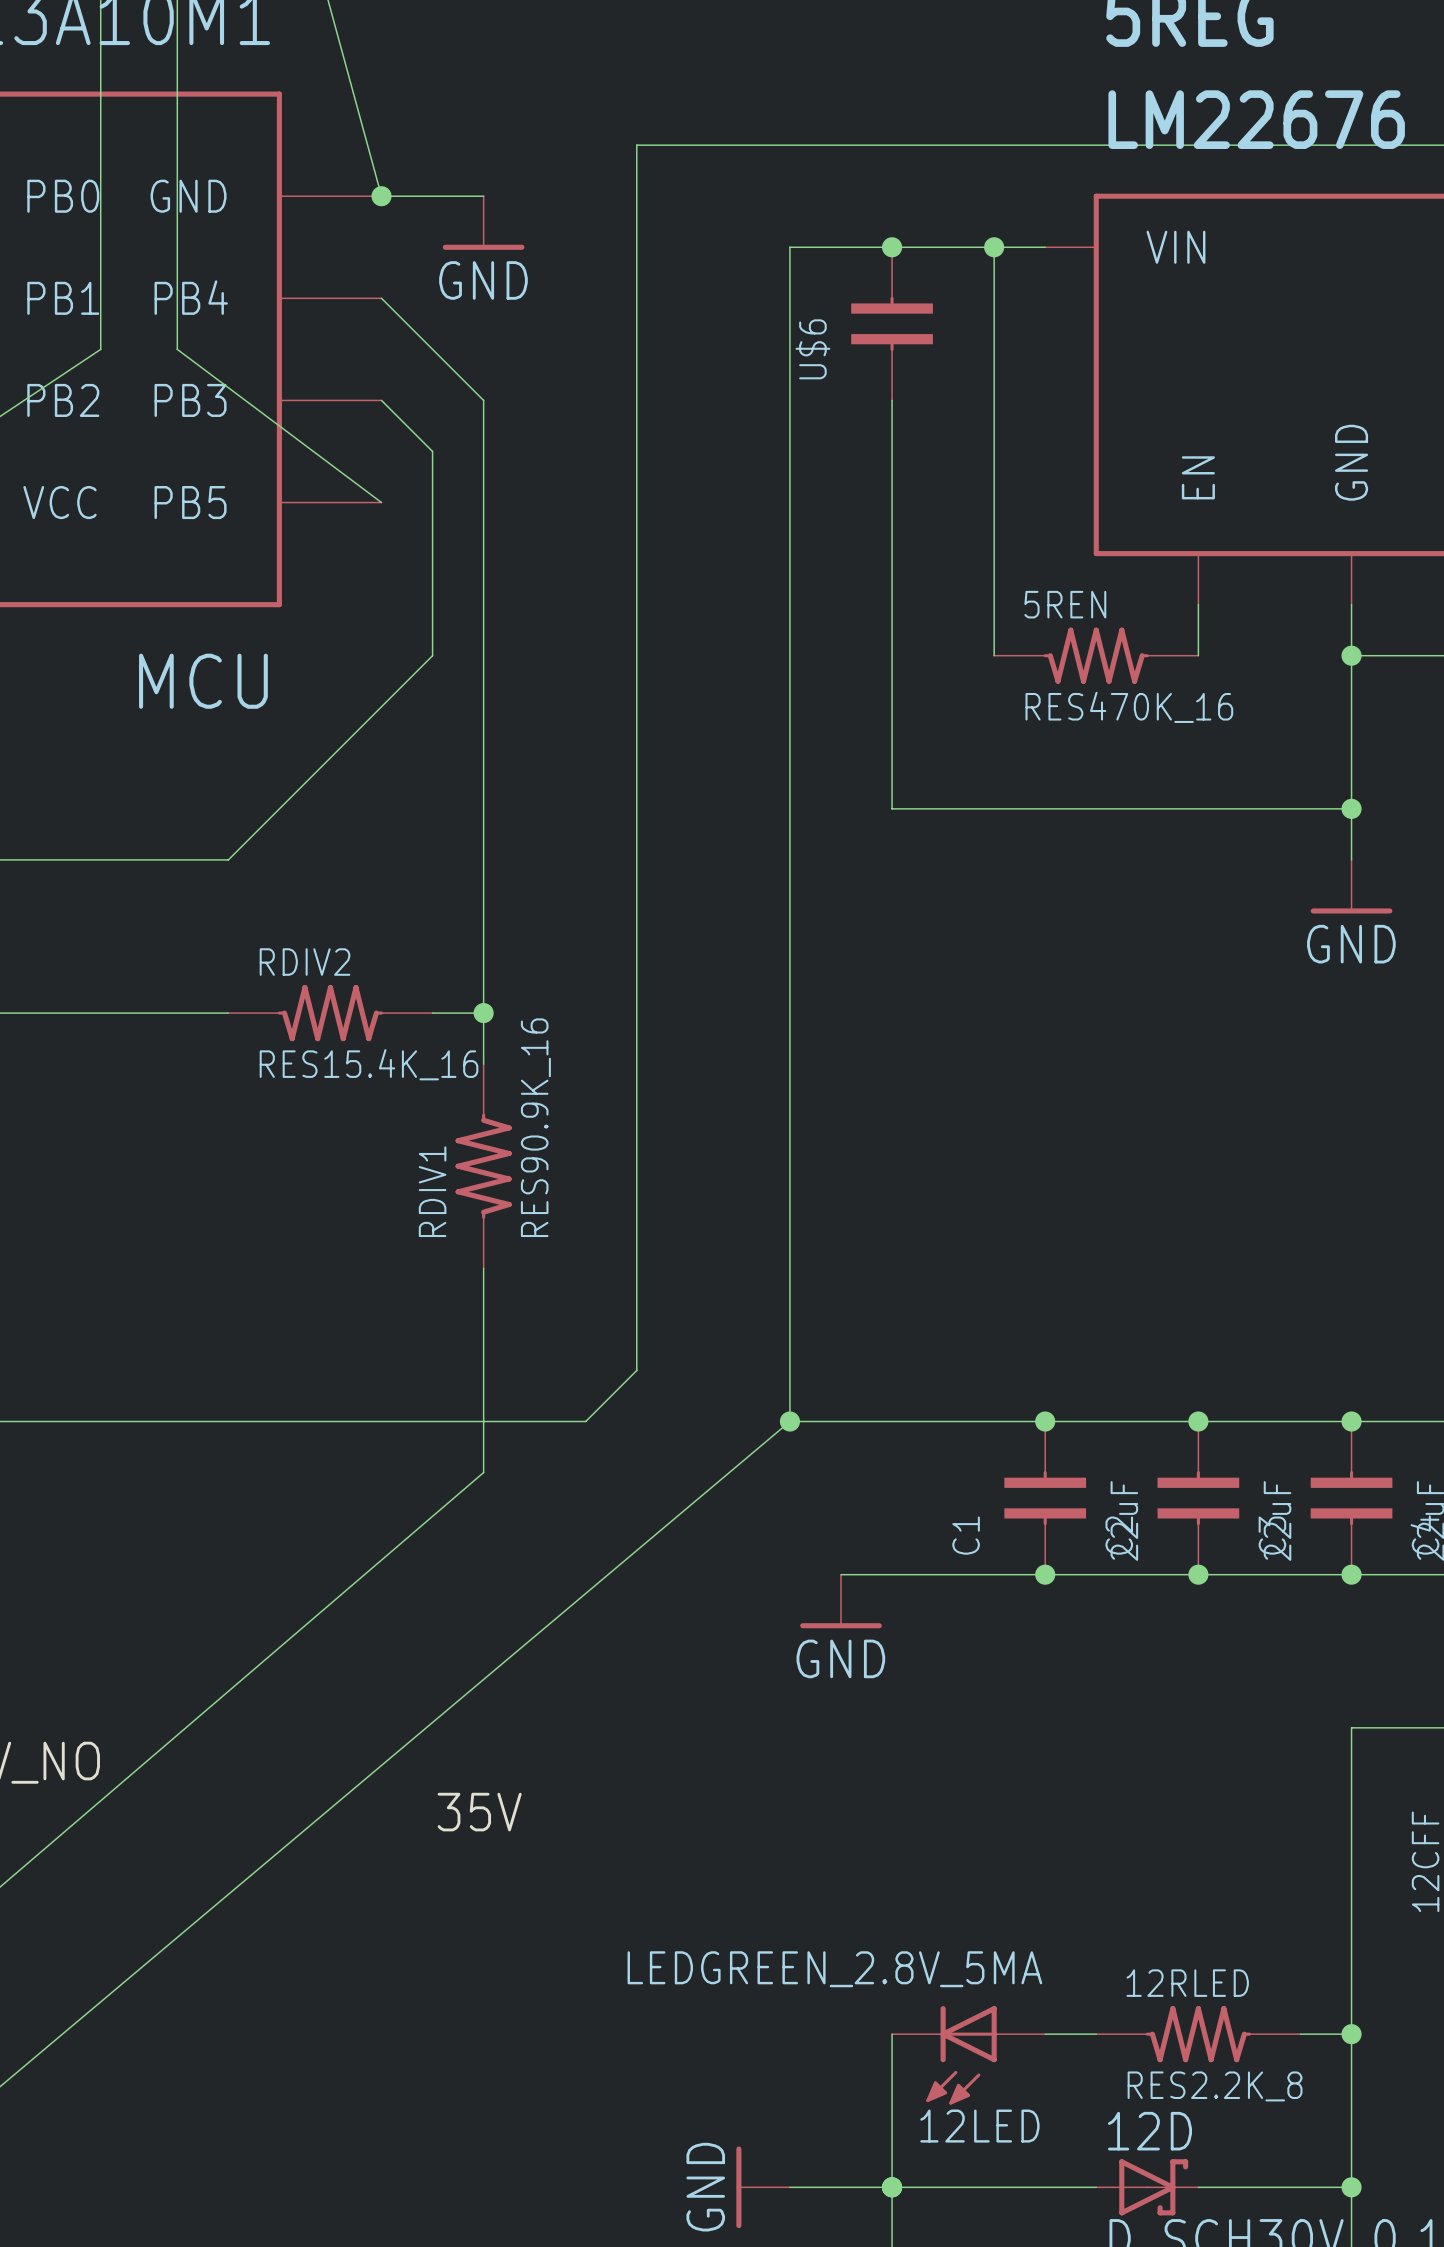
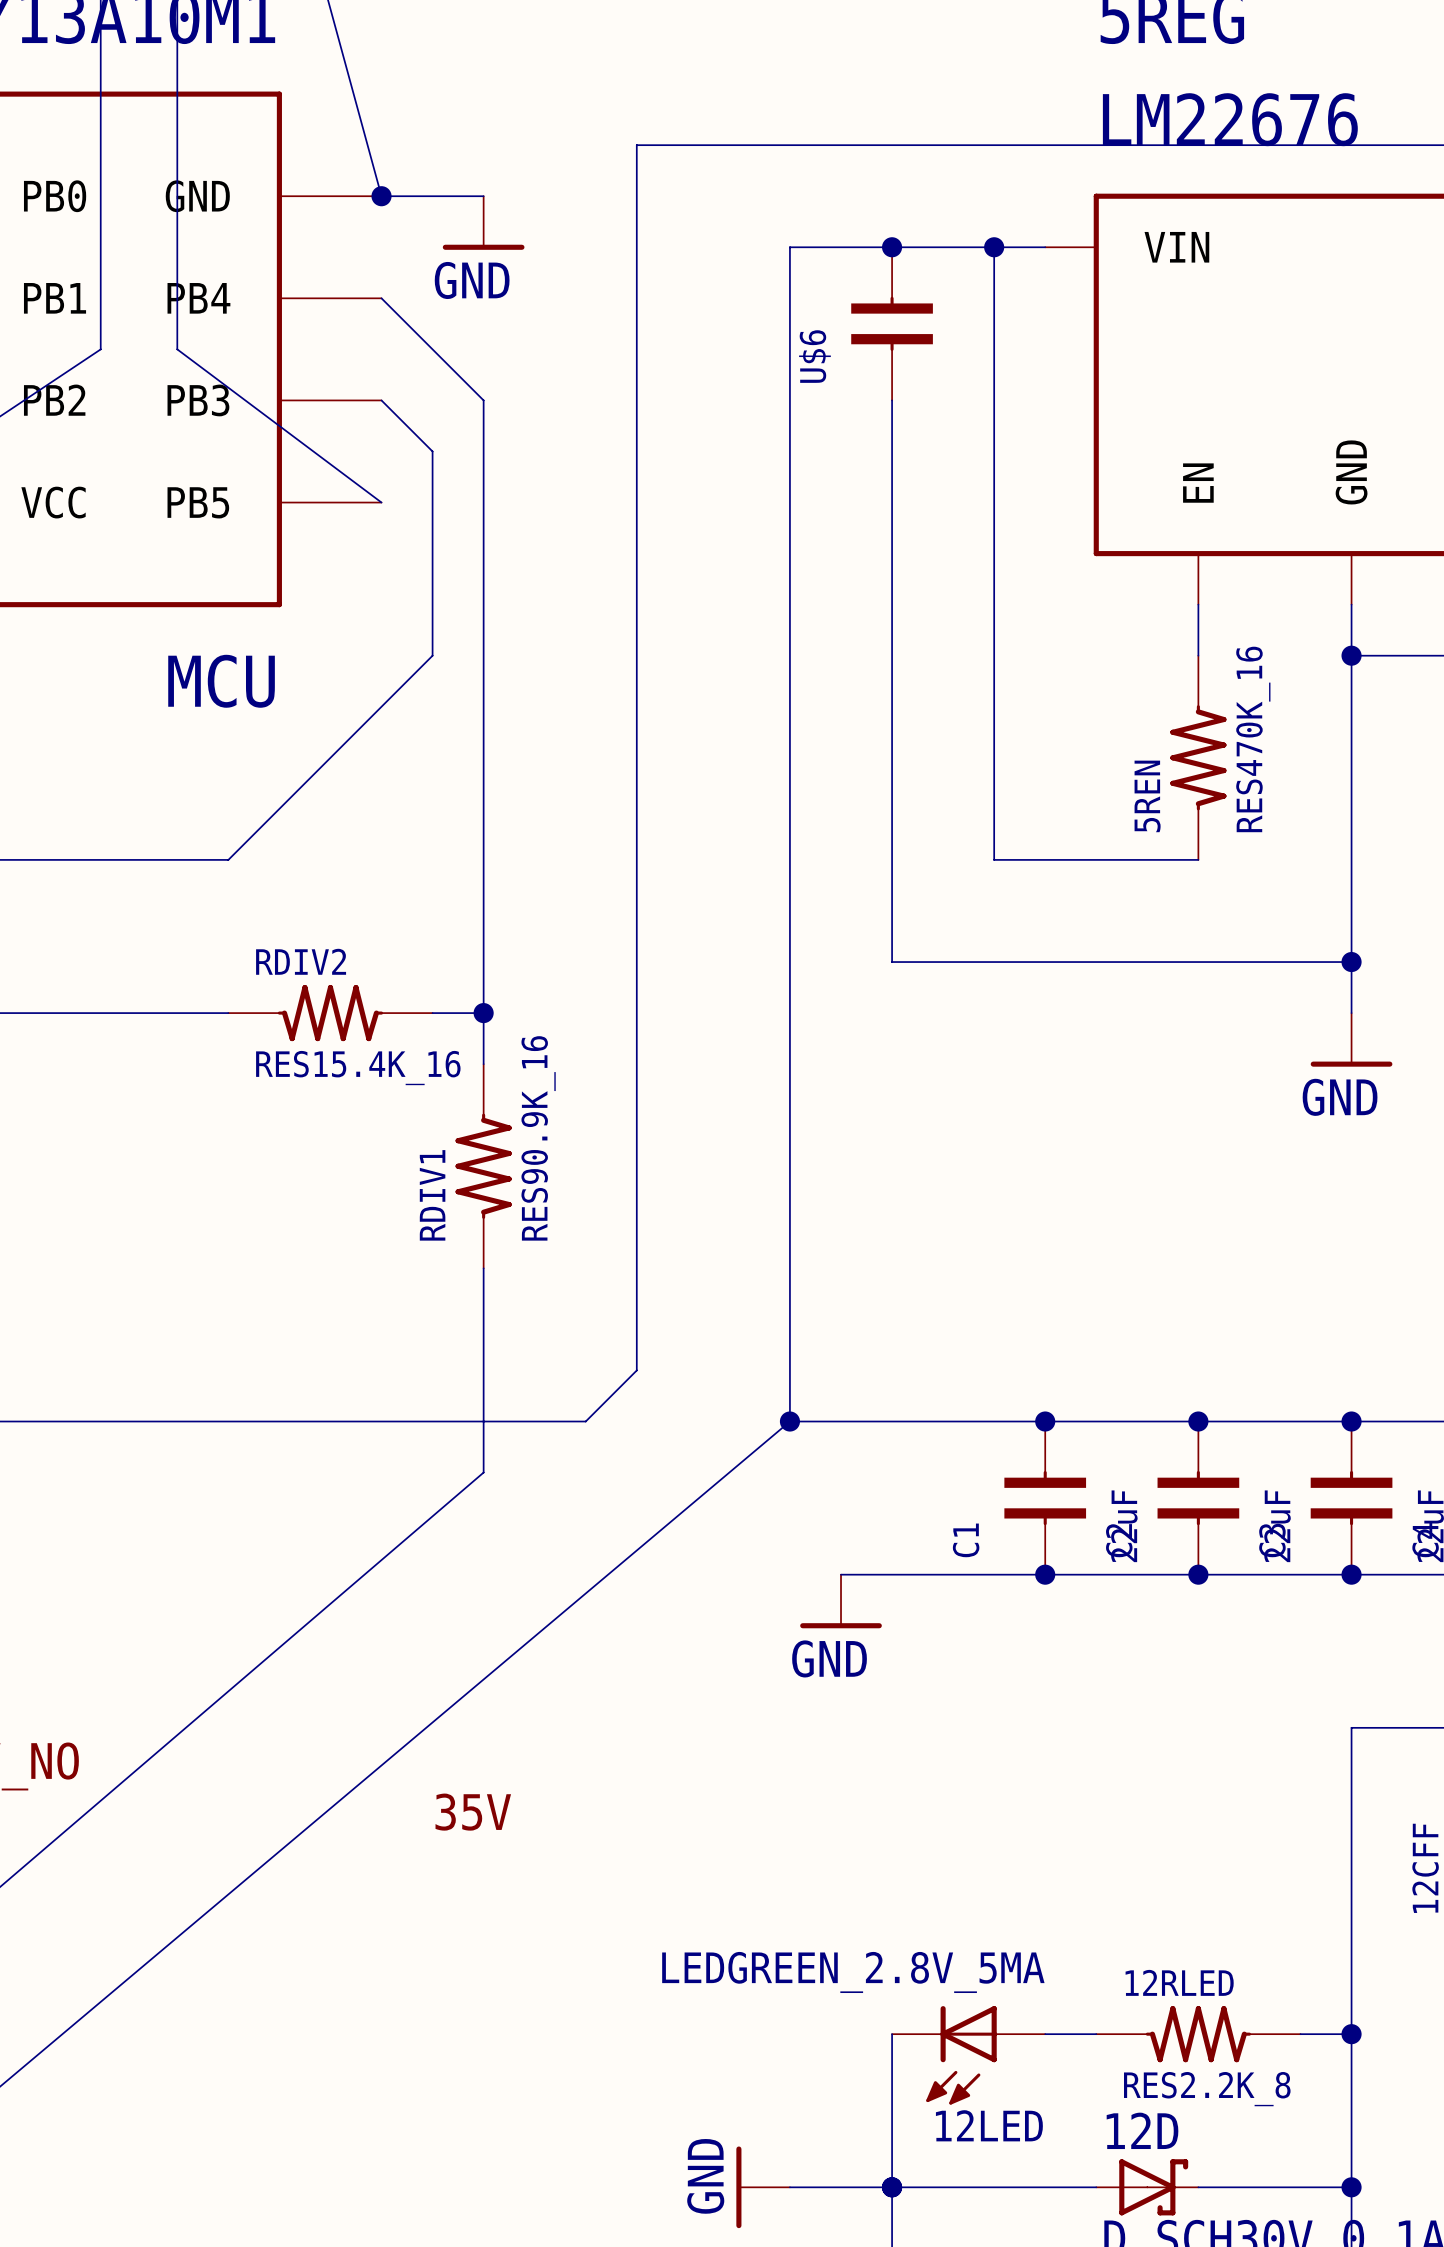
wire: none -> (994, 655) (994, 859) (1198, 859)
5REN rotation: 0° (1096, 655) -> 90° counterclockwise (1198, 757)
5REN position: (1096, 655) -> (1198, 757)
wire: (892, 808) (1351, 808) -> (892, 808) (892, 962) (1351, 962)
junction: (1351, 808) -> none
wire: none -> (1351, 859) (1351, 1013)
power symbol position: GND (1351, 886) -> GND (1351, 1039)
junction: none -> (1351, 962)

